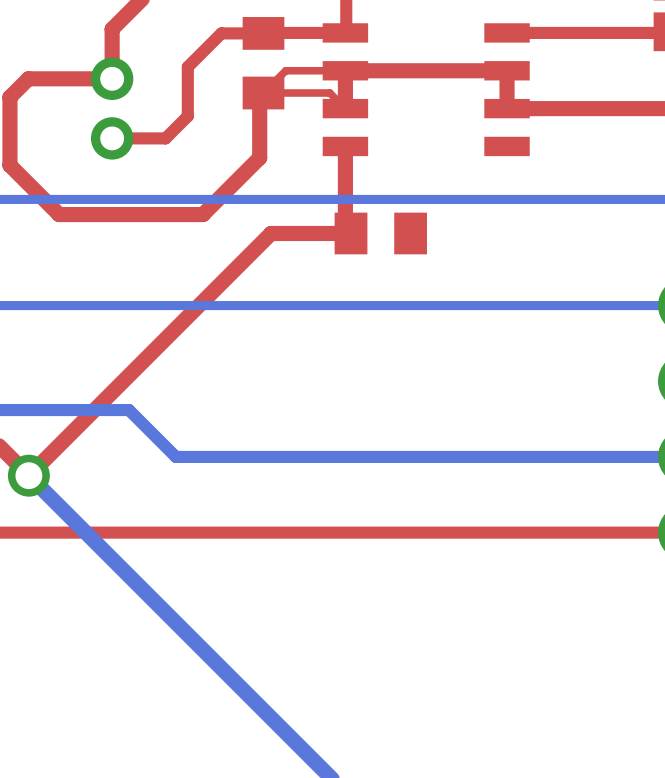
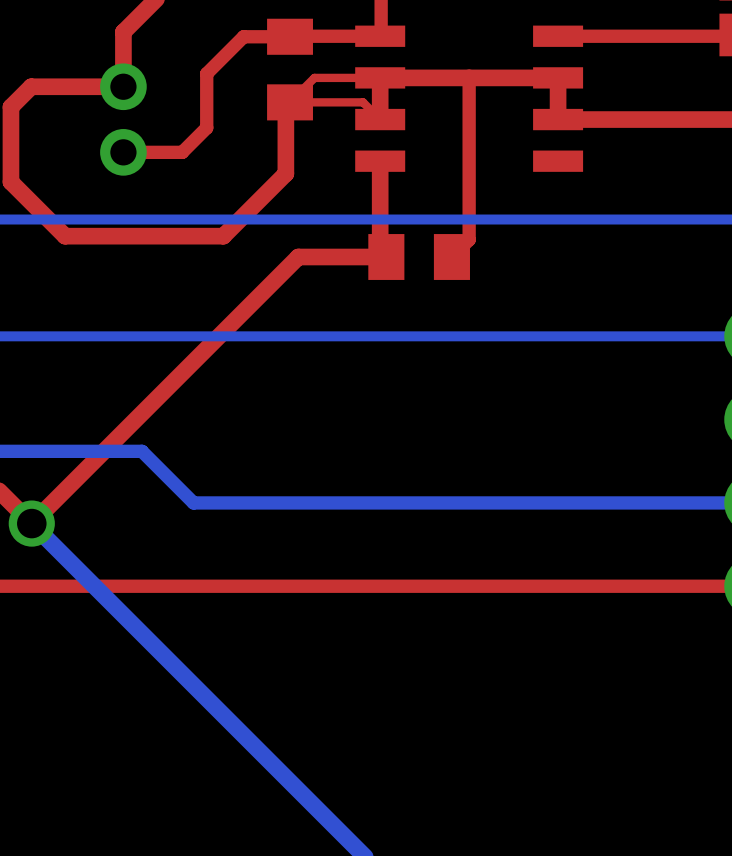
top track: none -> (469, 77) (469, 239) (451, 257)

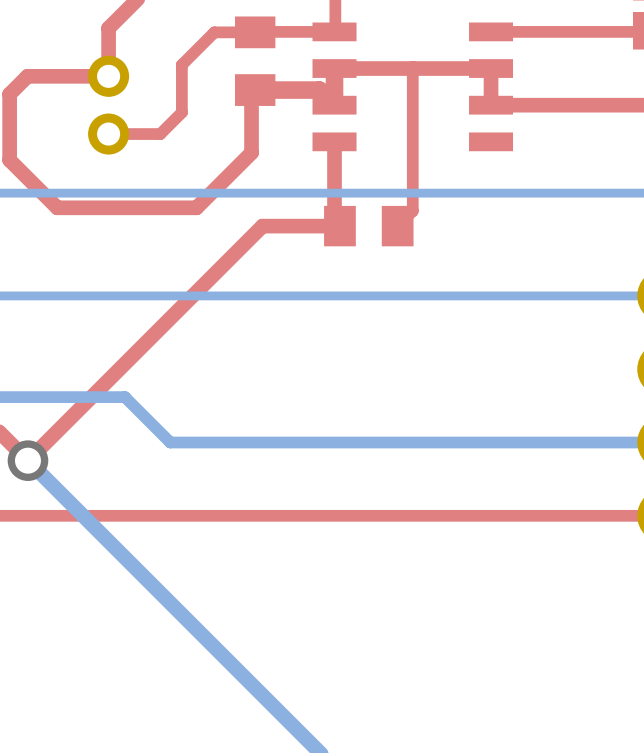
top track: (380, 77) (314, 77) (290, 102) -> none
top track width: thin (380, 77) (380, 119) (363, 102) (290, 102) -> thick (334, 68) (334, 105) (319, 90) (255, 90)

